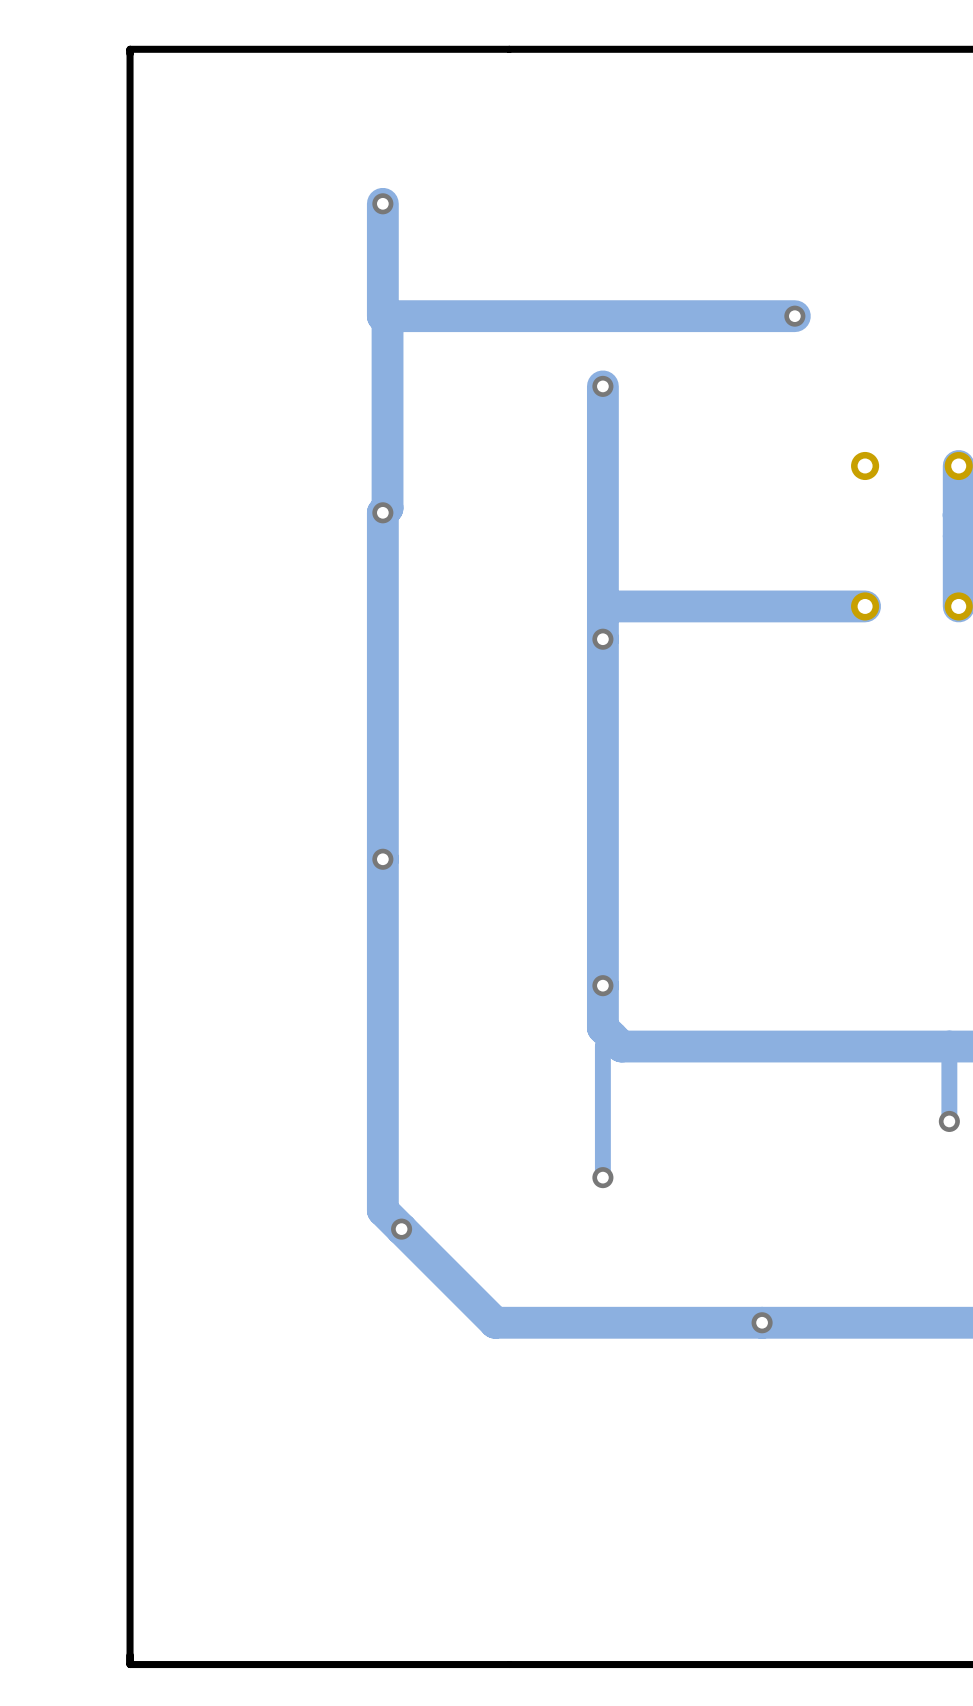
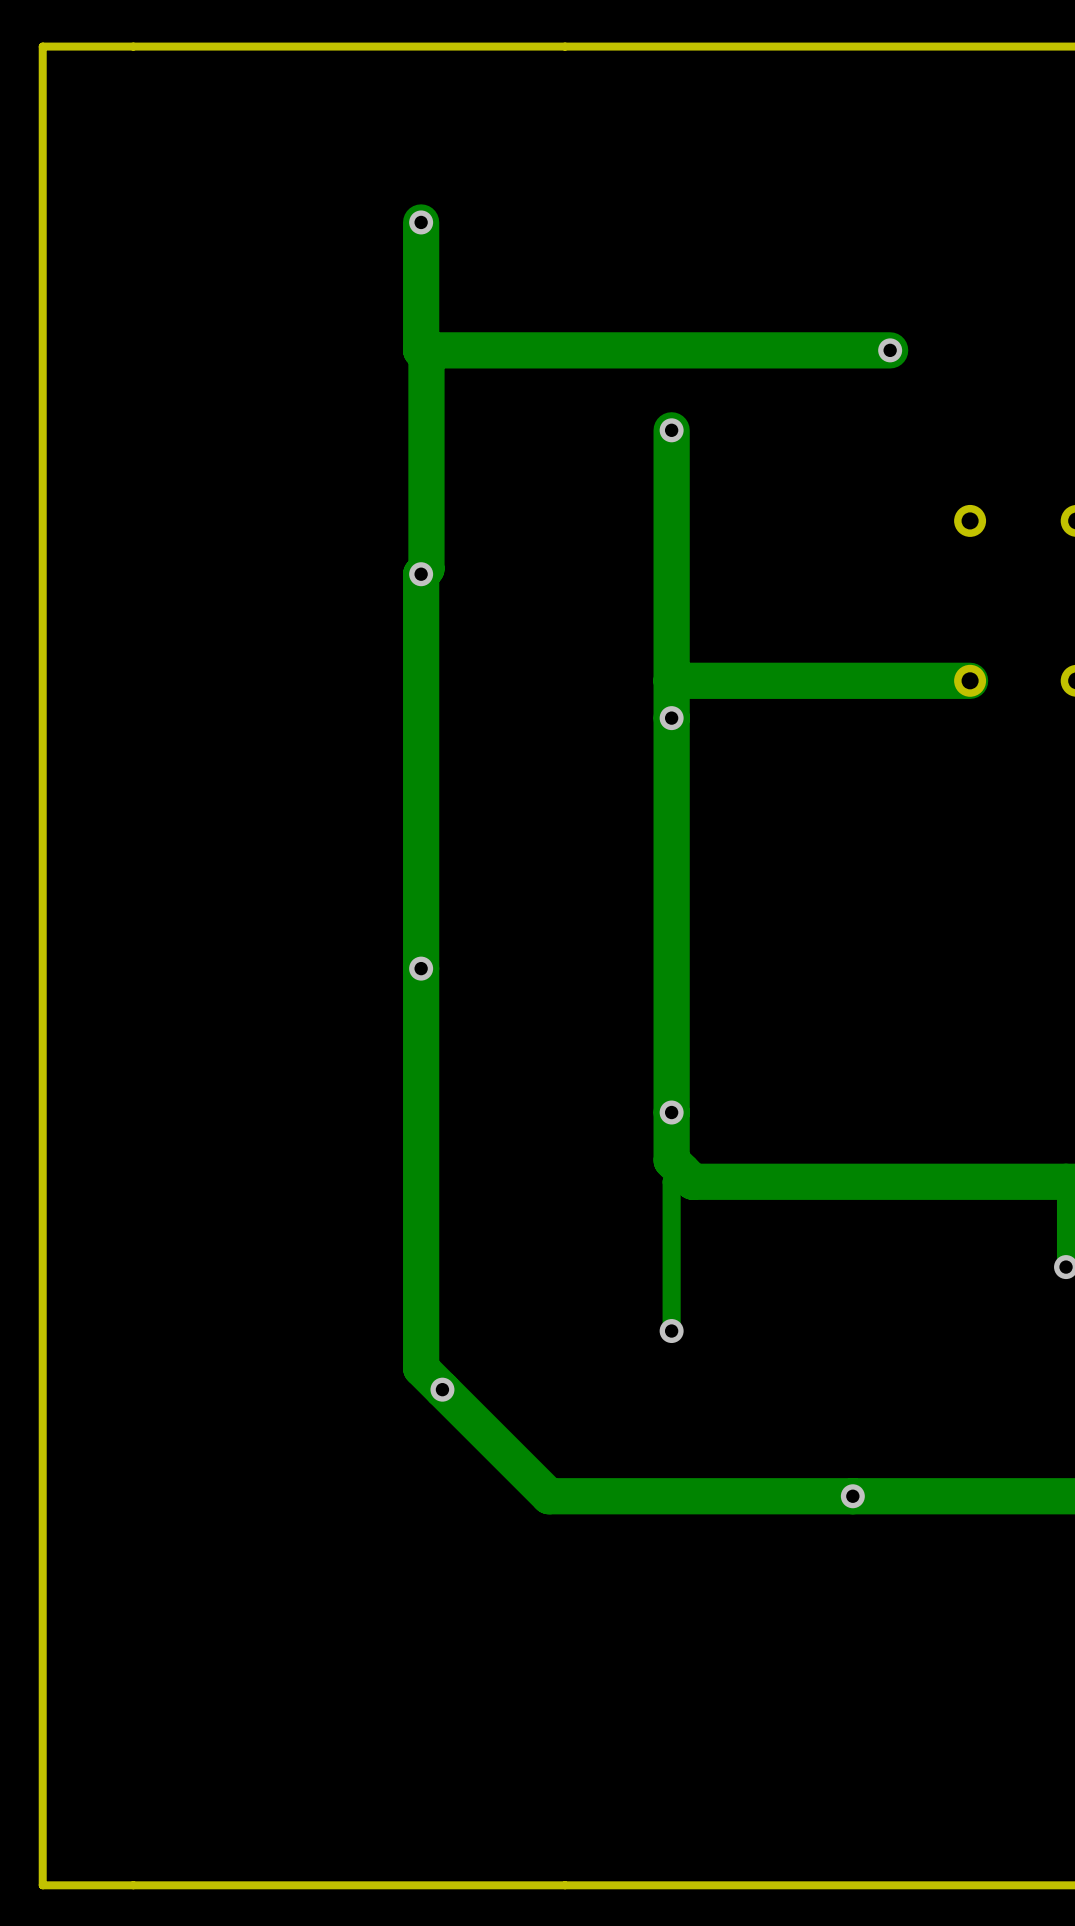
board edge: (130, 49) (130, 1664) -> (133, 46) (42, 46) (42, 1885) (133, 1885)

